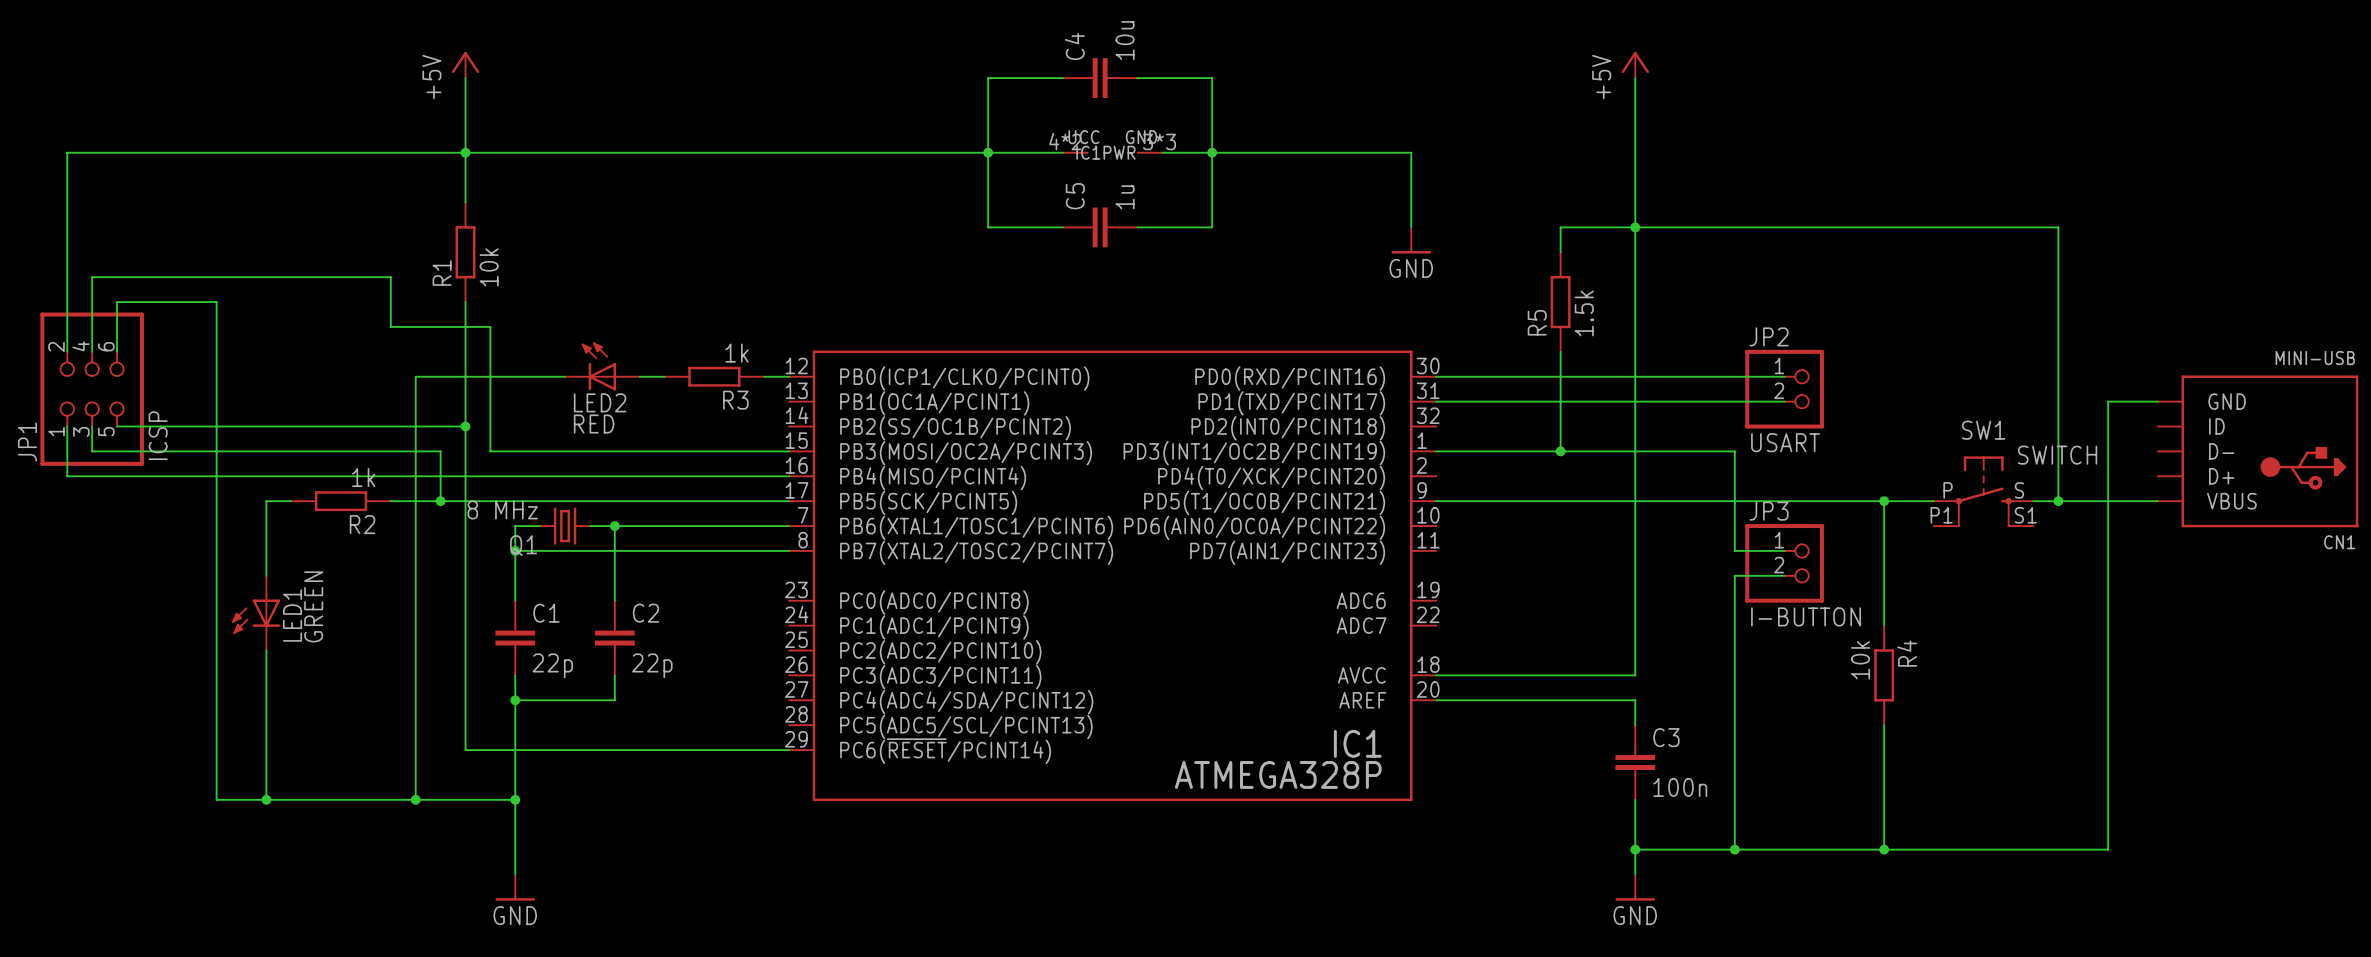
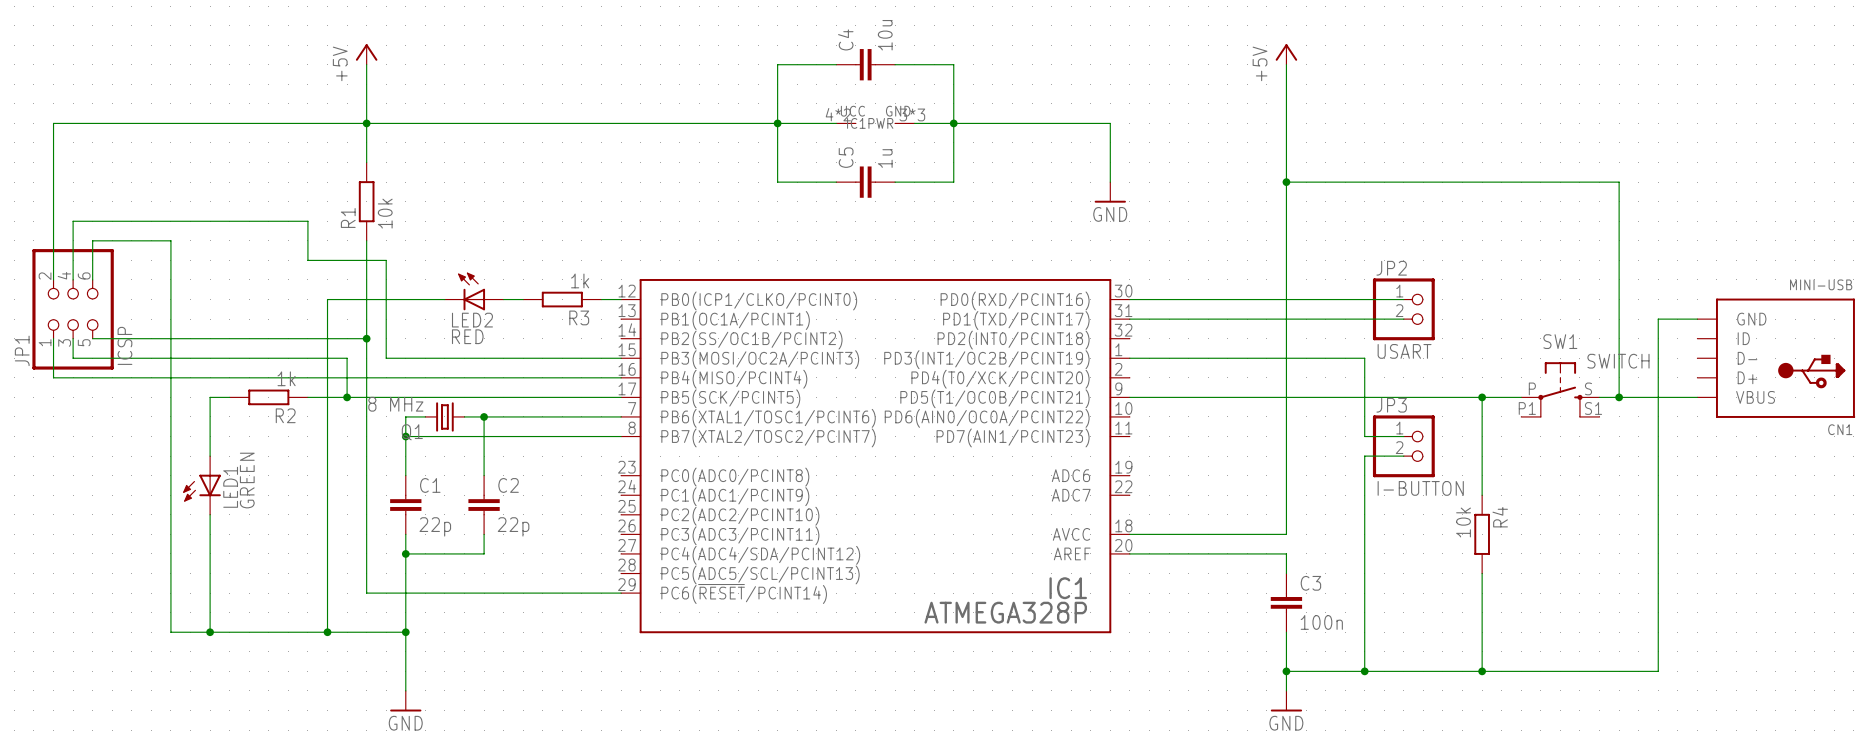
wire: (1635, 227) (1560, 227) (1560, 252) -> none
R5: 1.5k (1560, 302) -> none
wire: (1560, 351) (1560, 451) -> none
junction: (1560, 451) -> none

